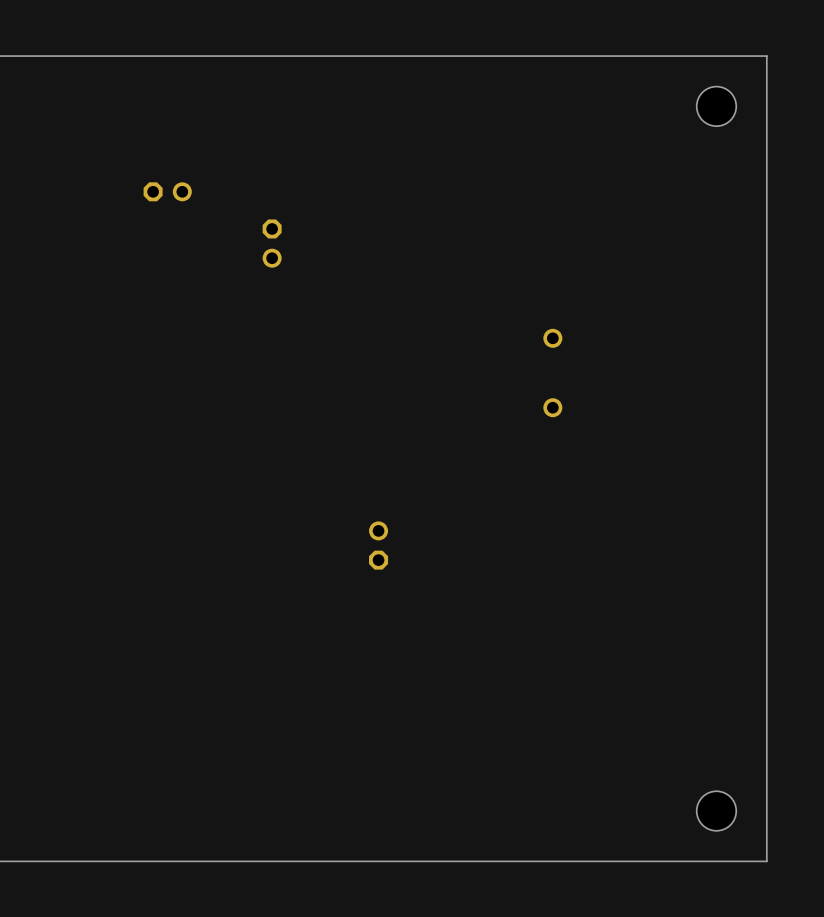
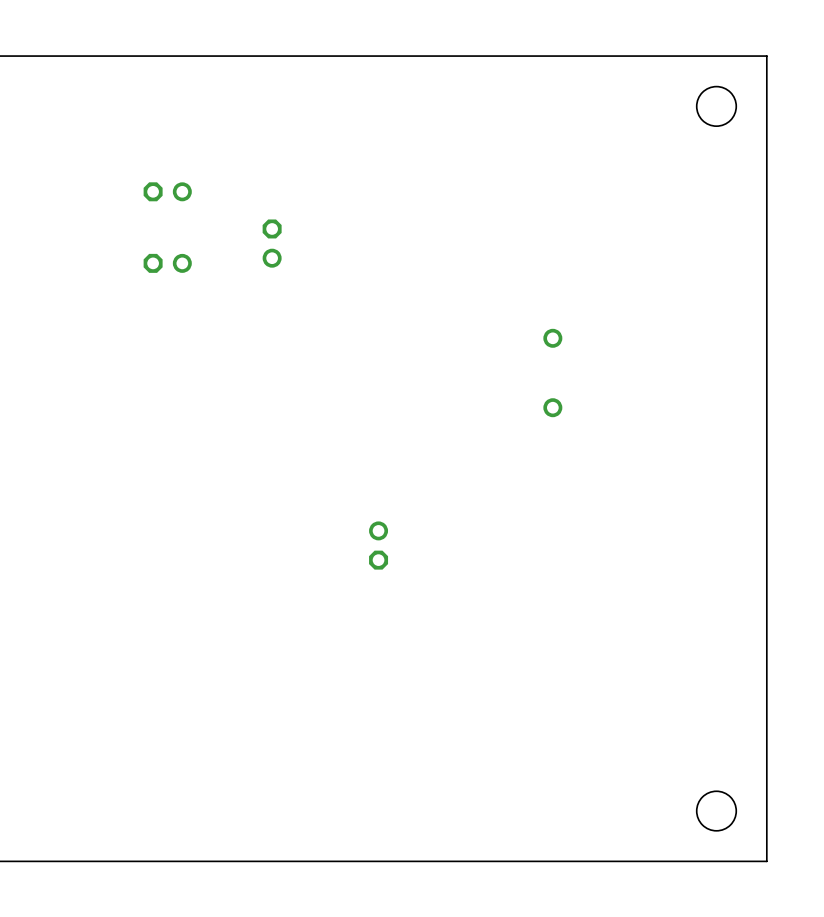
part: none -> (167, 263)

